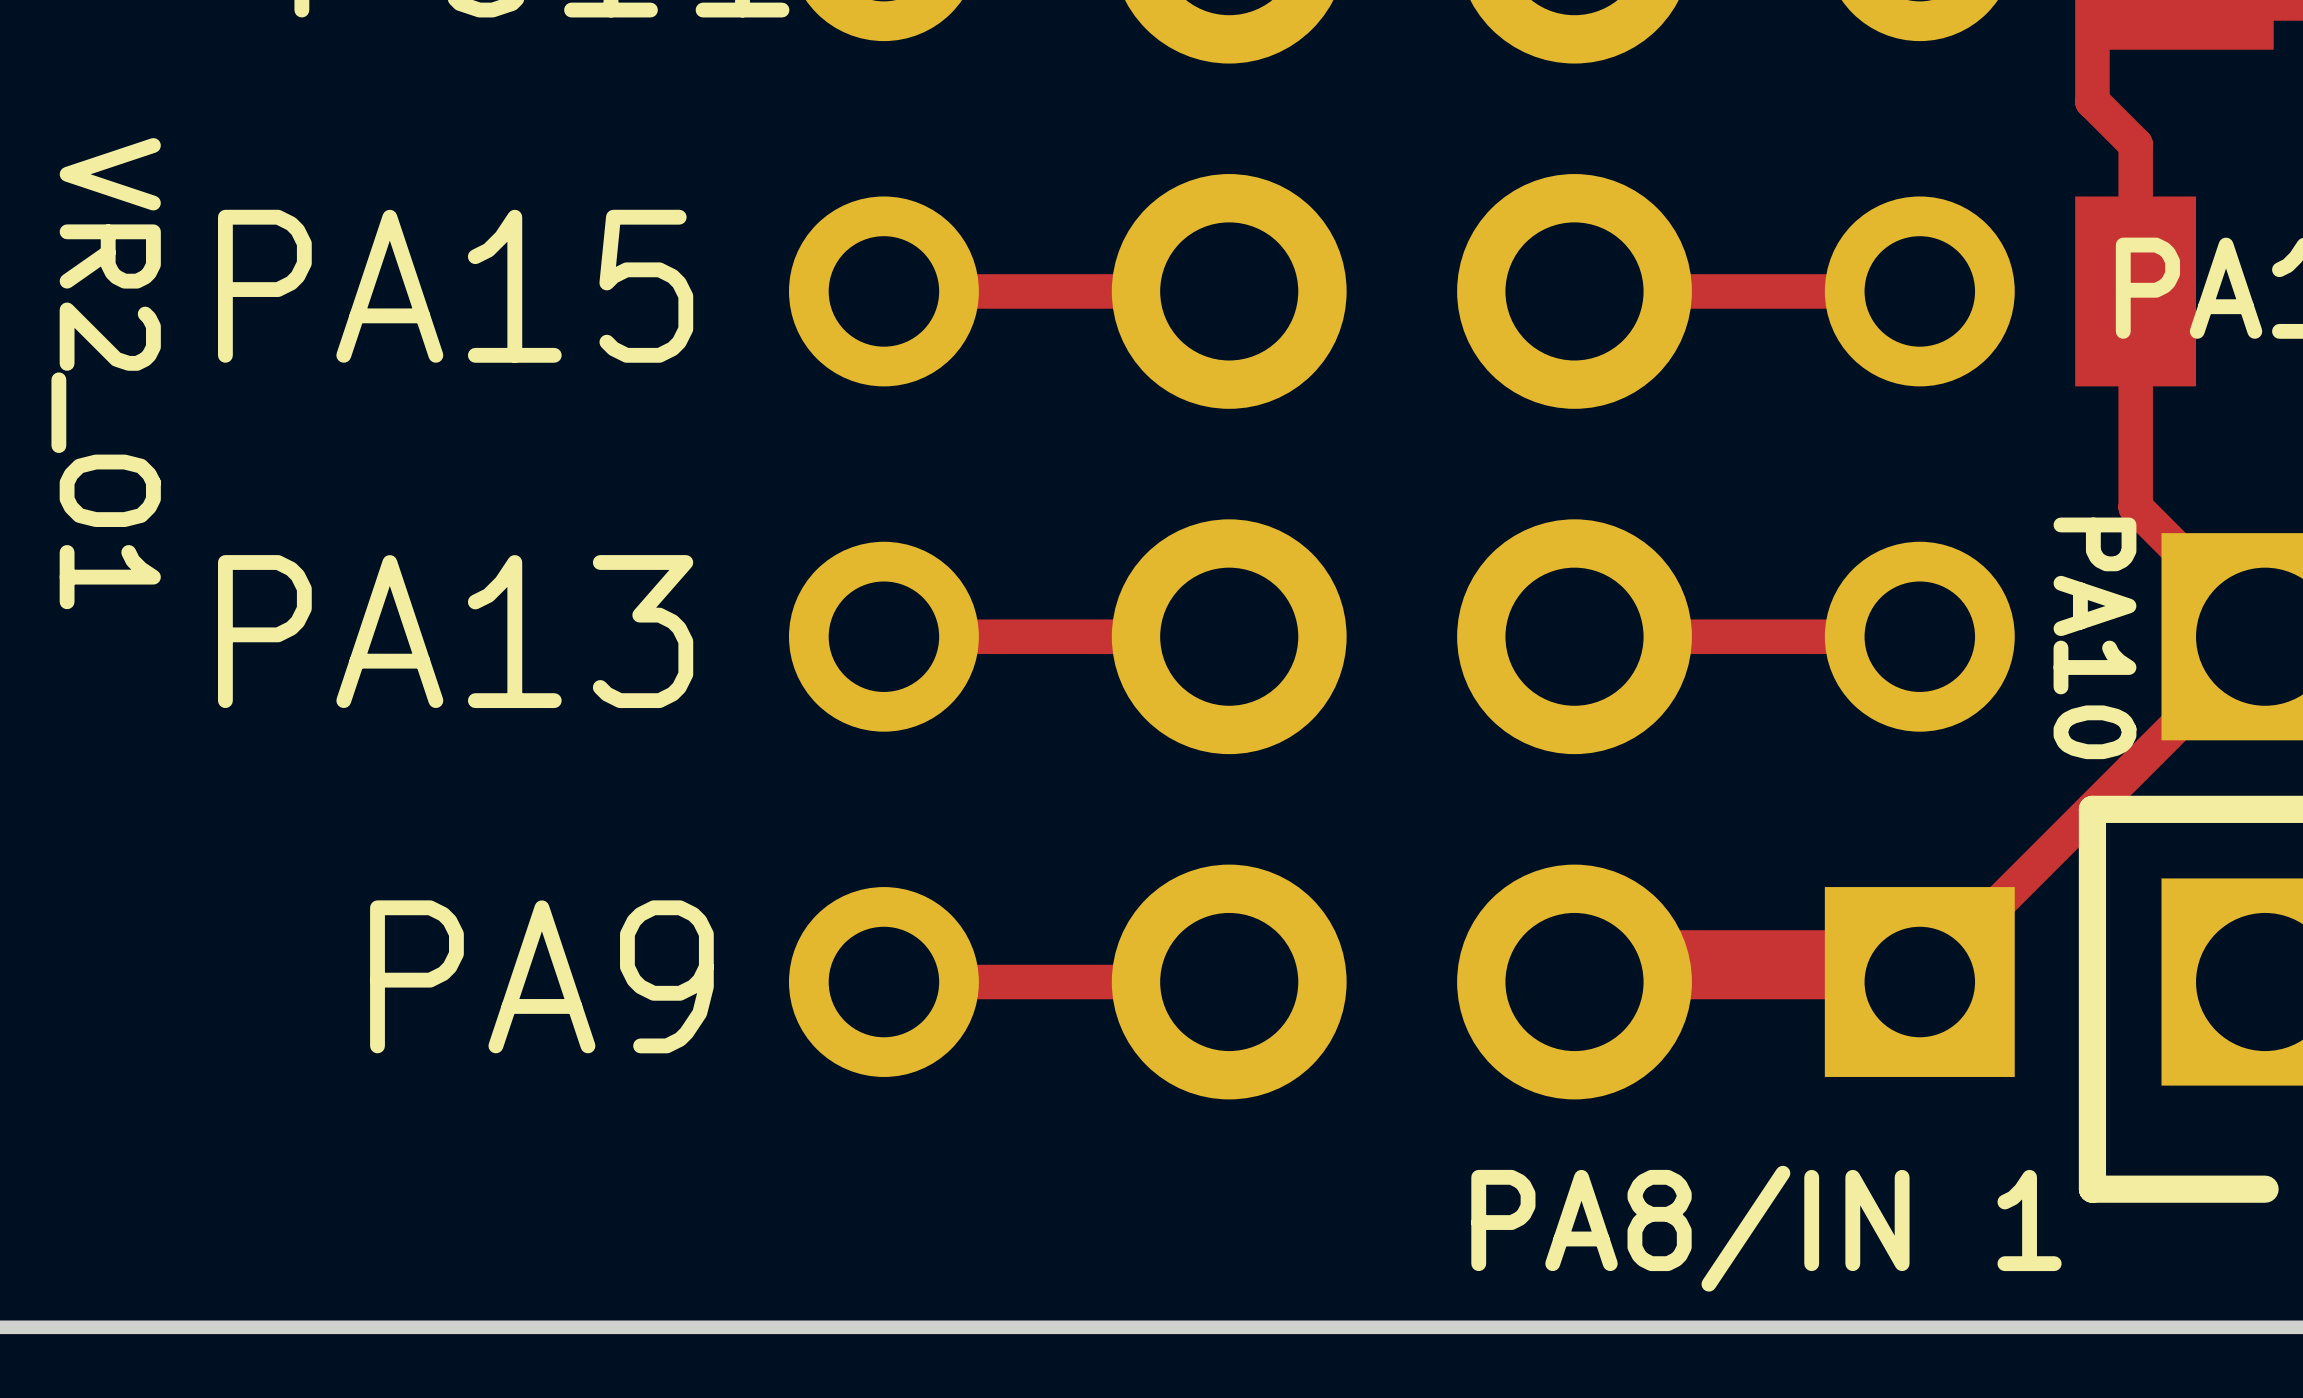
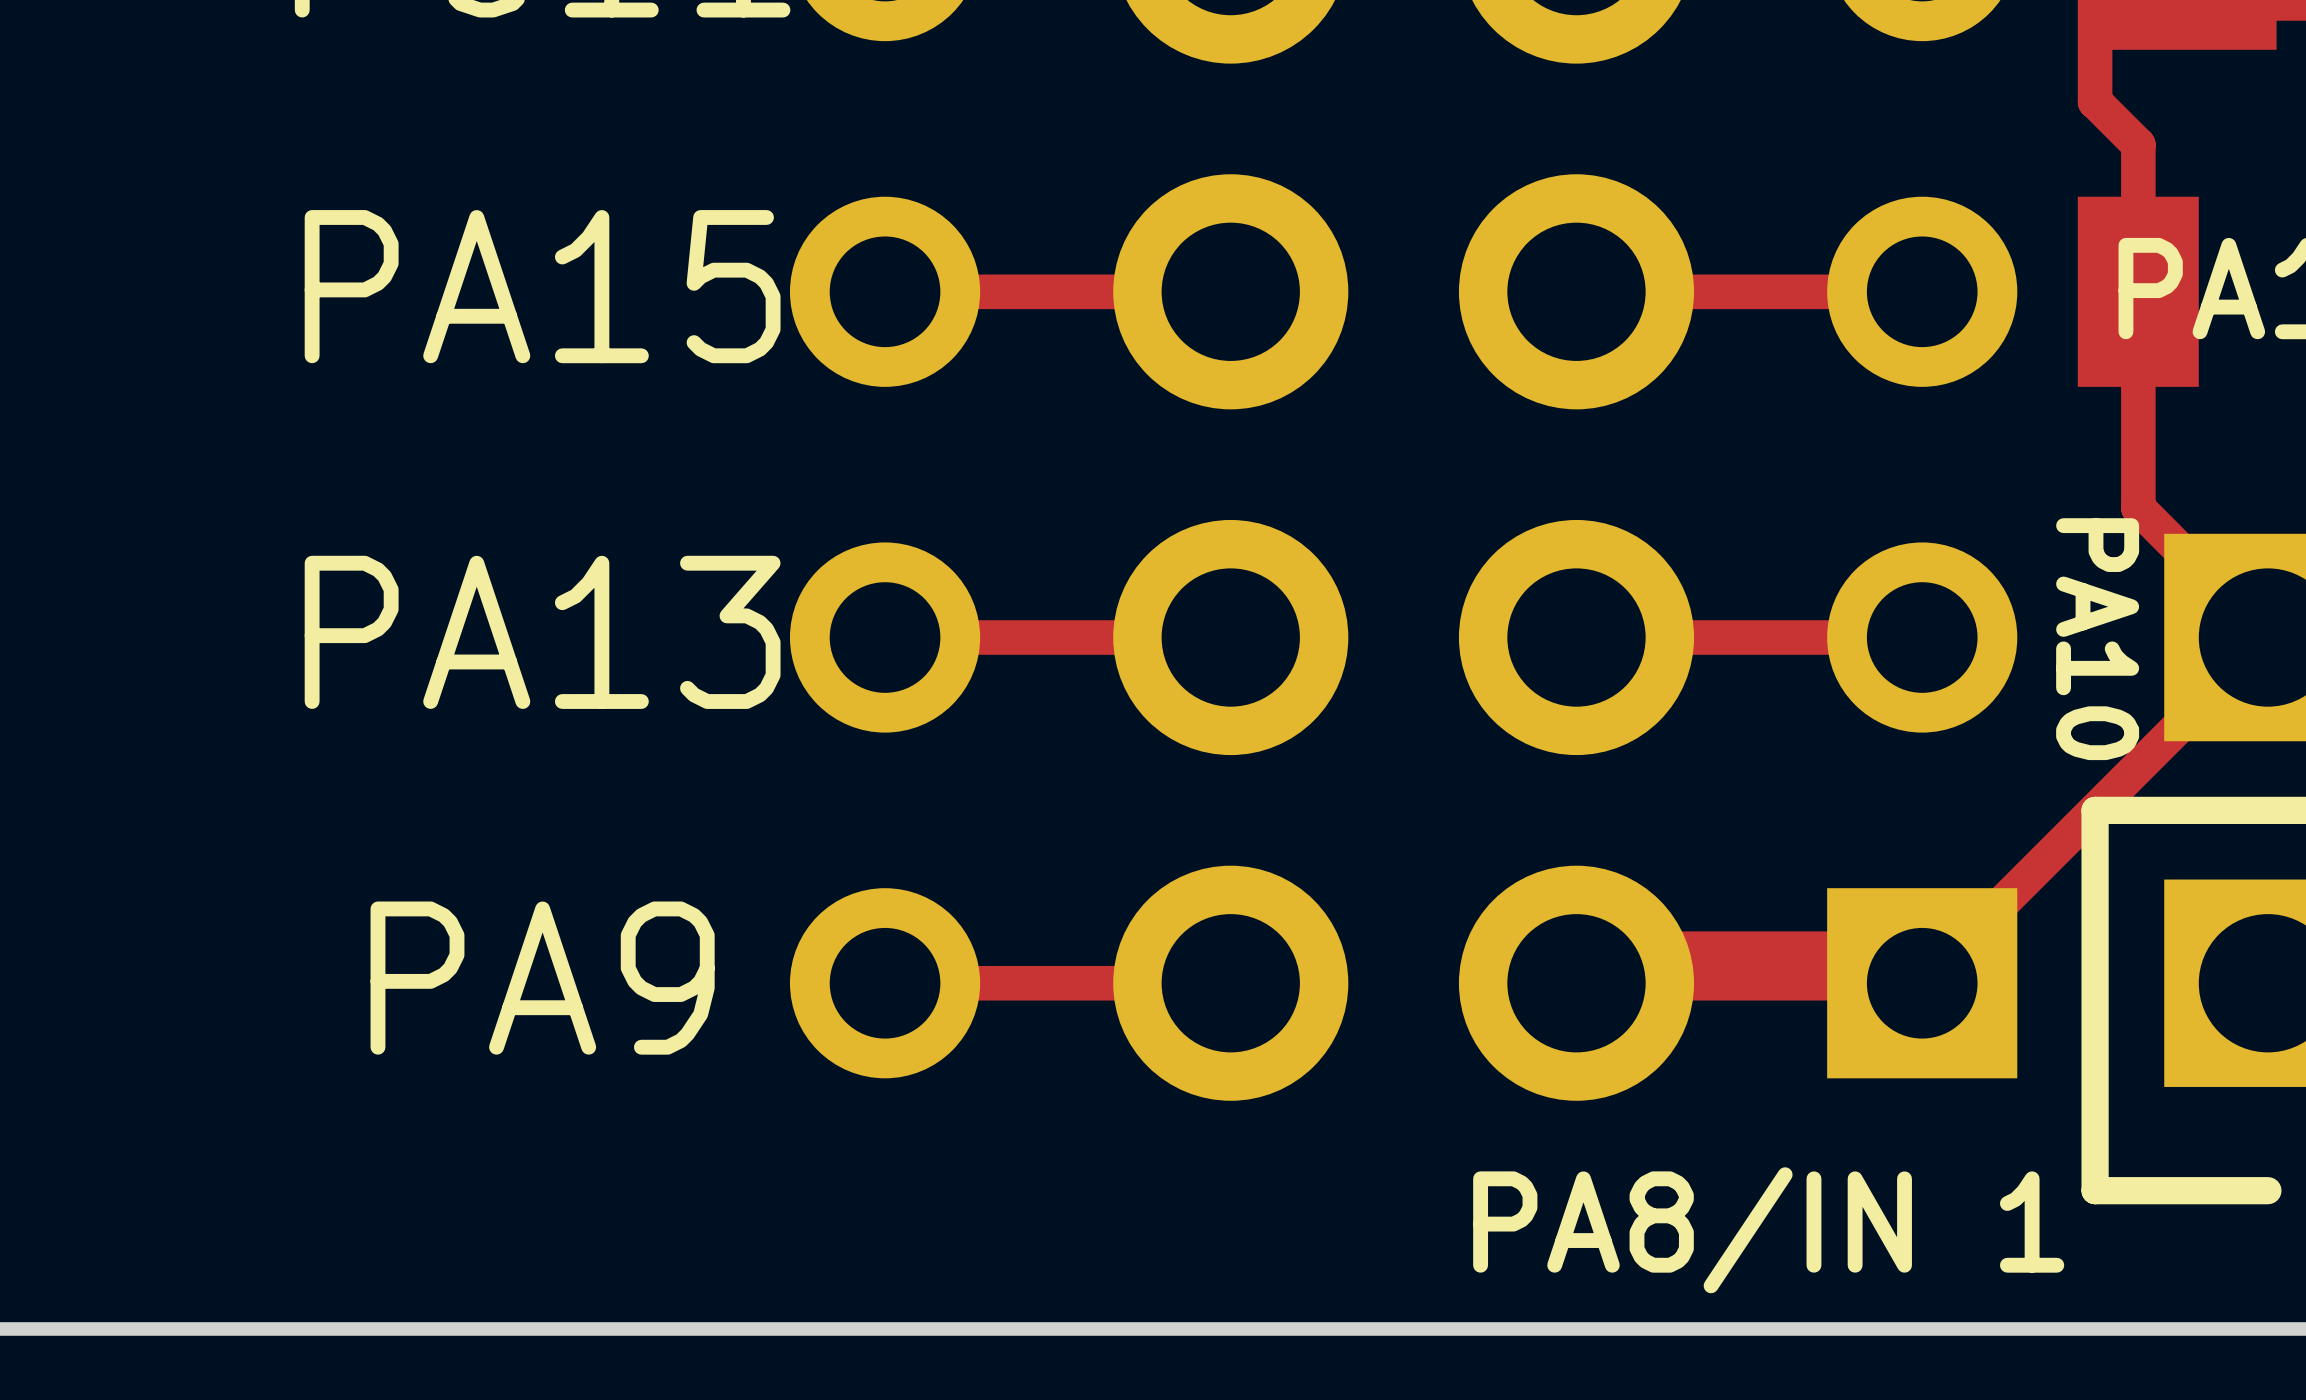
text position: PA15 (455, 286) -> PA15 (542, 286)
text: VR2_O1 (106, 373) -> none
text position: PA13 (455, 631) -> PA13 (542, 632)

